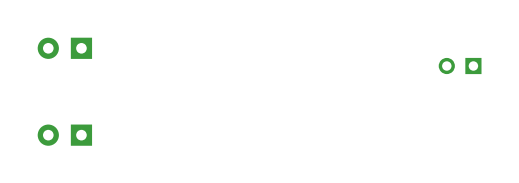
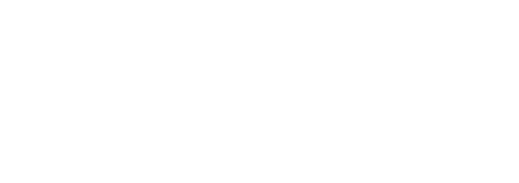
part: (64, 48) -> none
part: (460, 66) -> none
part: (64, 135) -> none

